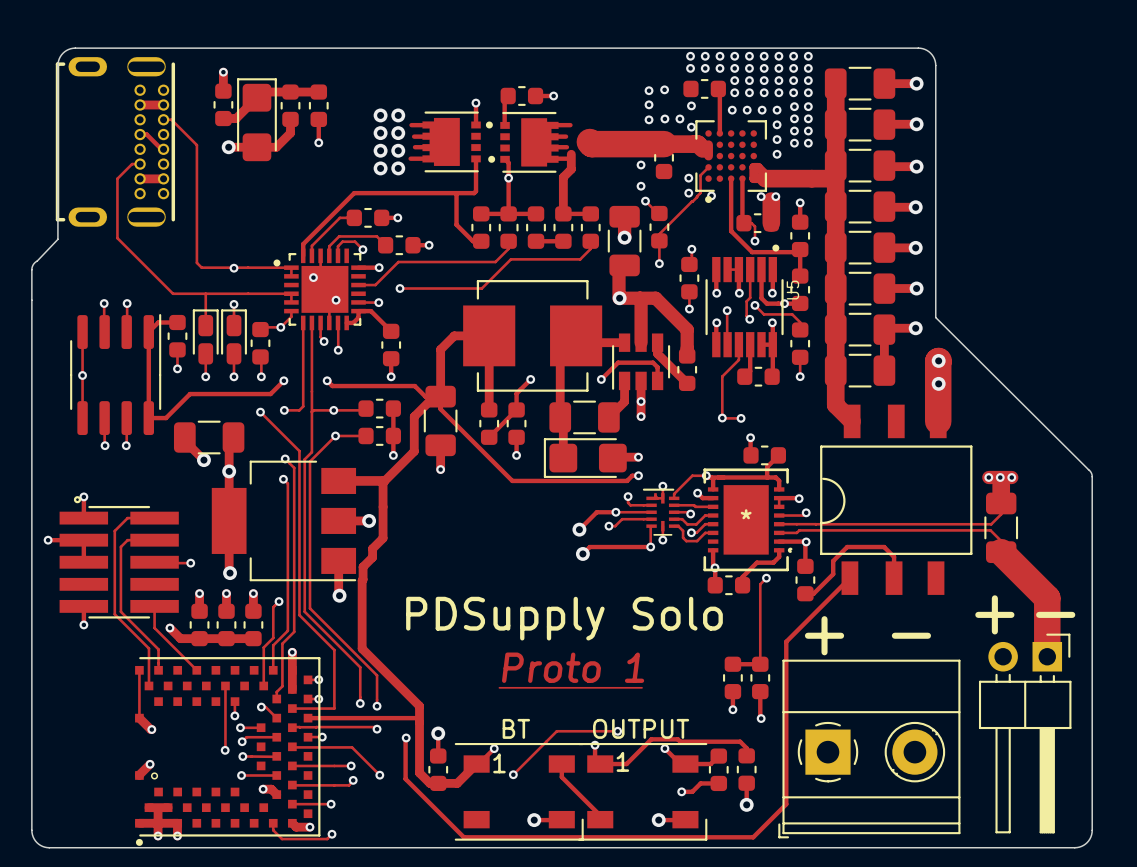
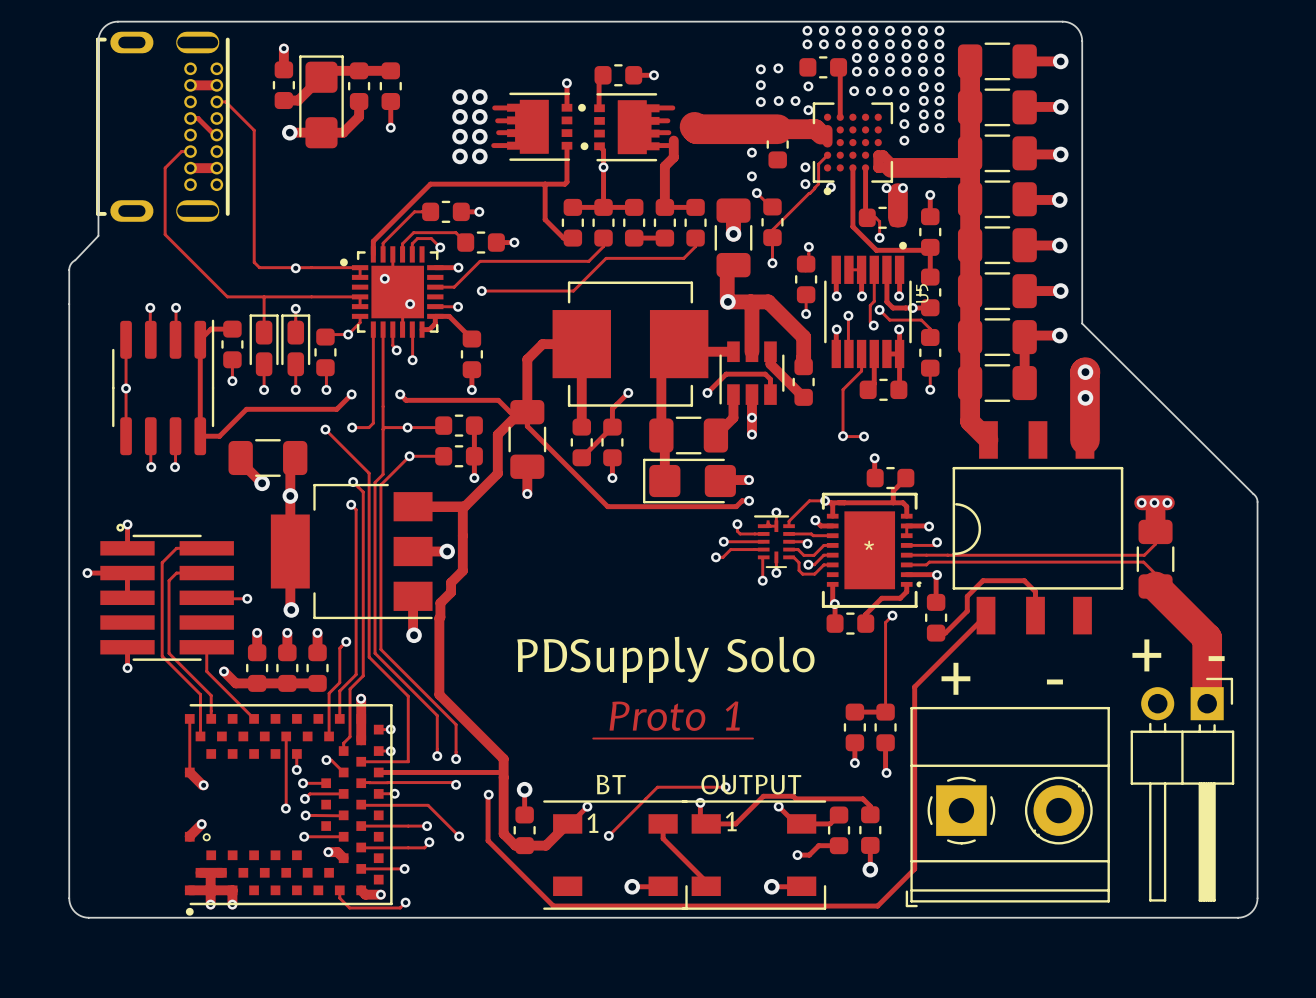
track: (615, 512) (596, 512) (579, 529) -> none
via: (579, 529) -> none
track: (650, 547) (589, 547) (582, 553) -> none
via: (582, 553) -> none

